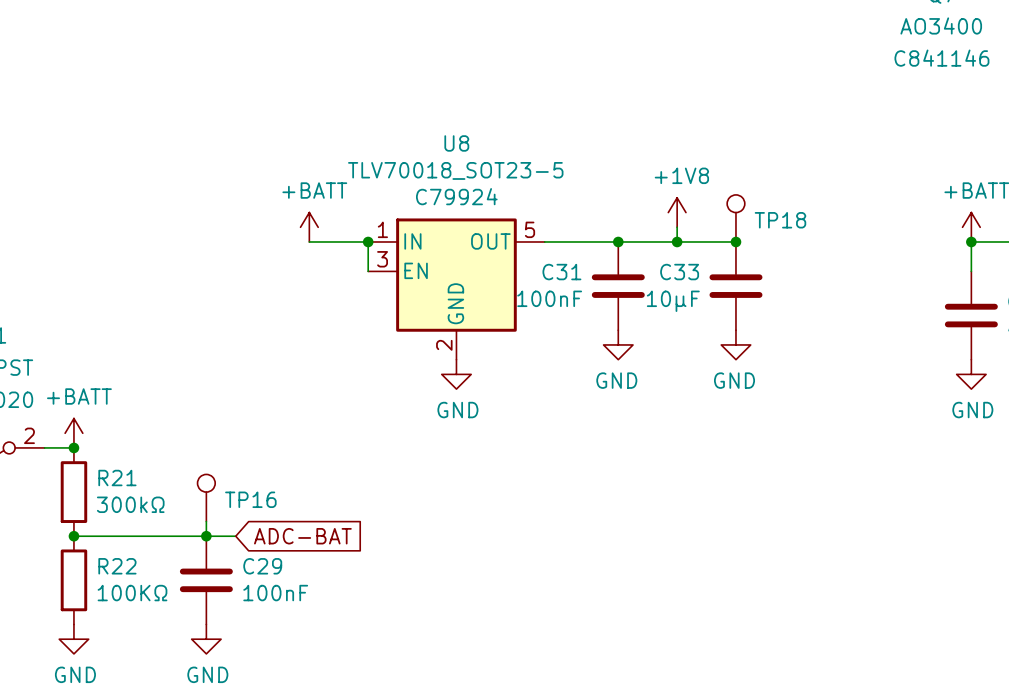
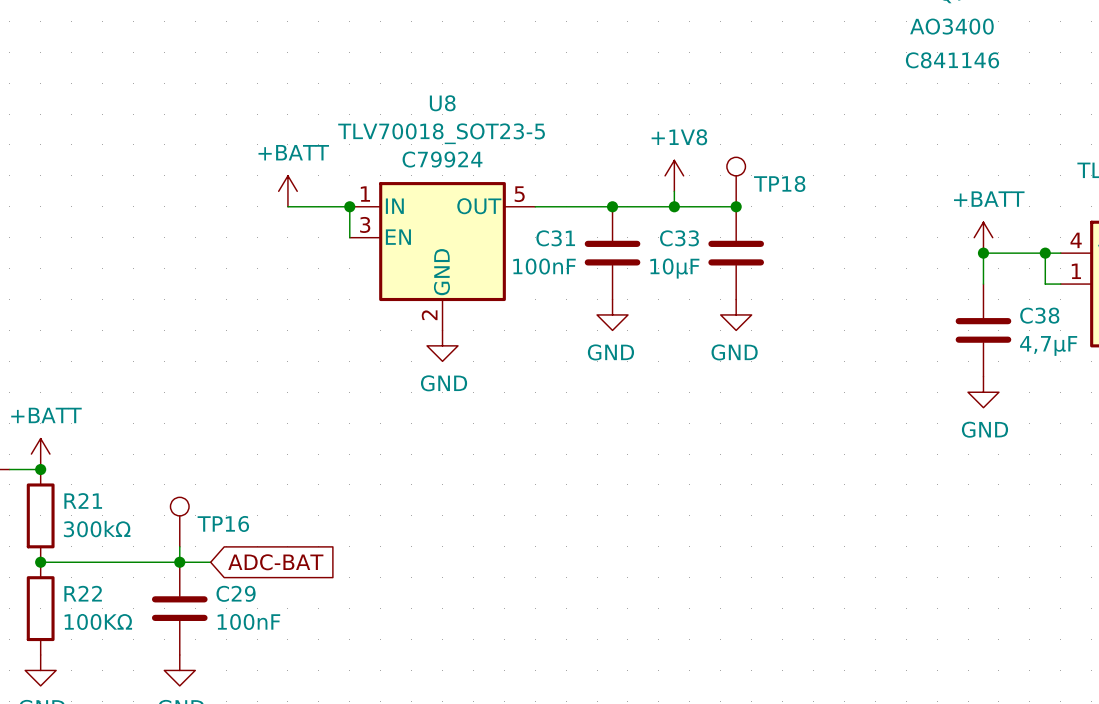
junction: none -> (612, 206)
junction: none -> (674, 206)
junction: none -> (736, 206)
power symbol position: +1V8 (677, 212) -> +1V8 (674, 175)
TP18 position: (735, 218) -> (736, 182)
power symbol position: +BATT (309, 227) -> +BATT (287, 191)
wire: (677, 227) (677, 241) -> (674, 191) (674, 206)
wire: (309, 241) (368, 241) (368, 271) -> (287, 206) (349, 206) (349, 237)
junction position: (368, 241) -> (349, 206)
wire: (544, 241) (735, 241) -> (535, 206) (736, 206)
junction: (618, 241) -> none
junction: (677, 241) -> none
junction: (735, 241) -> none
C31 position: (618, 286) -> (612, 253)
C33 position: (735, 286) -> (736, 253)
U8 position: (456, 289) -> (442, 256)
power symbol position: GND (618, 344) -> GND (612, 314)
power symbol position: GND (735, 344) -> GND (736, 314)
power symbol position: GND (456, 374) -> GND (442, 345)

